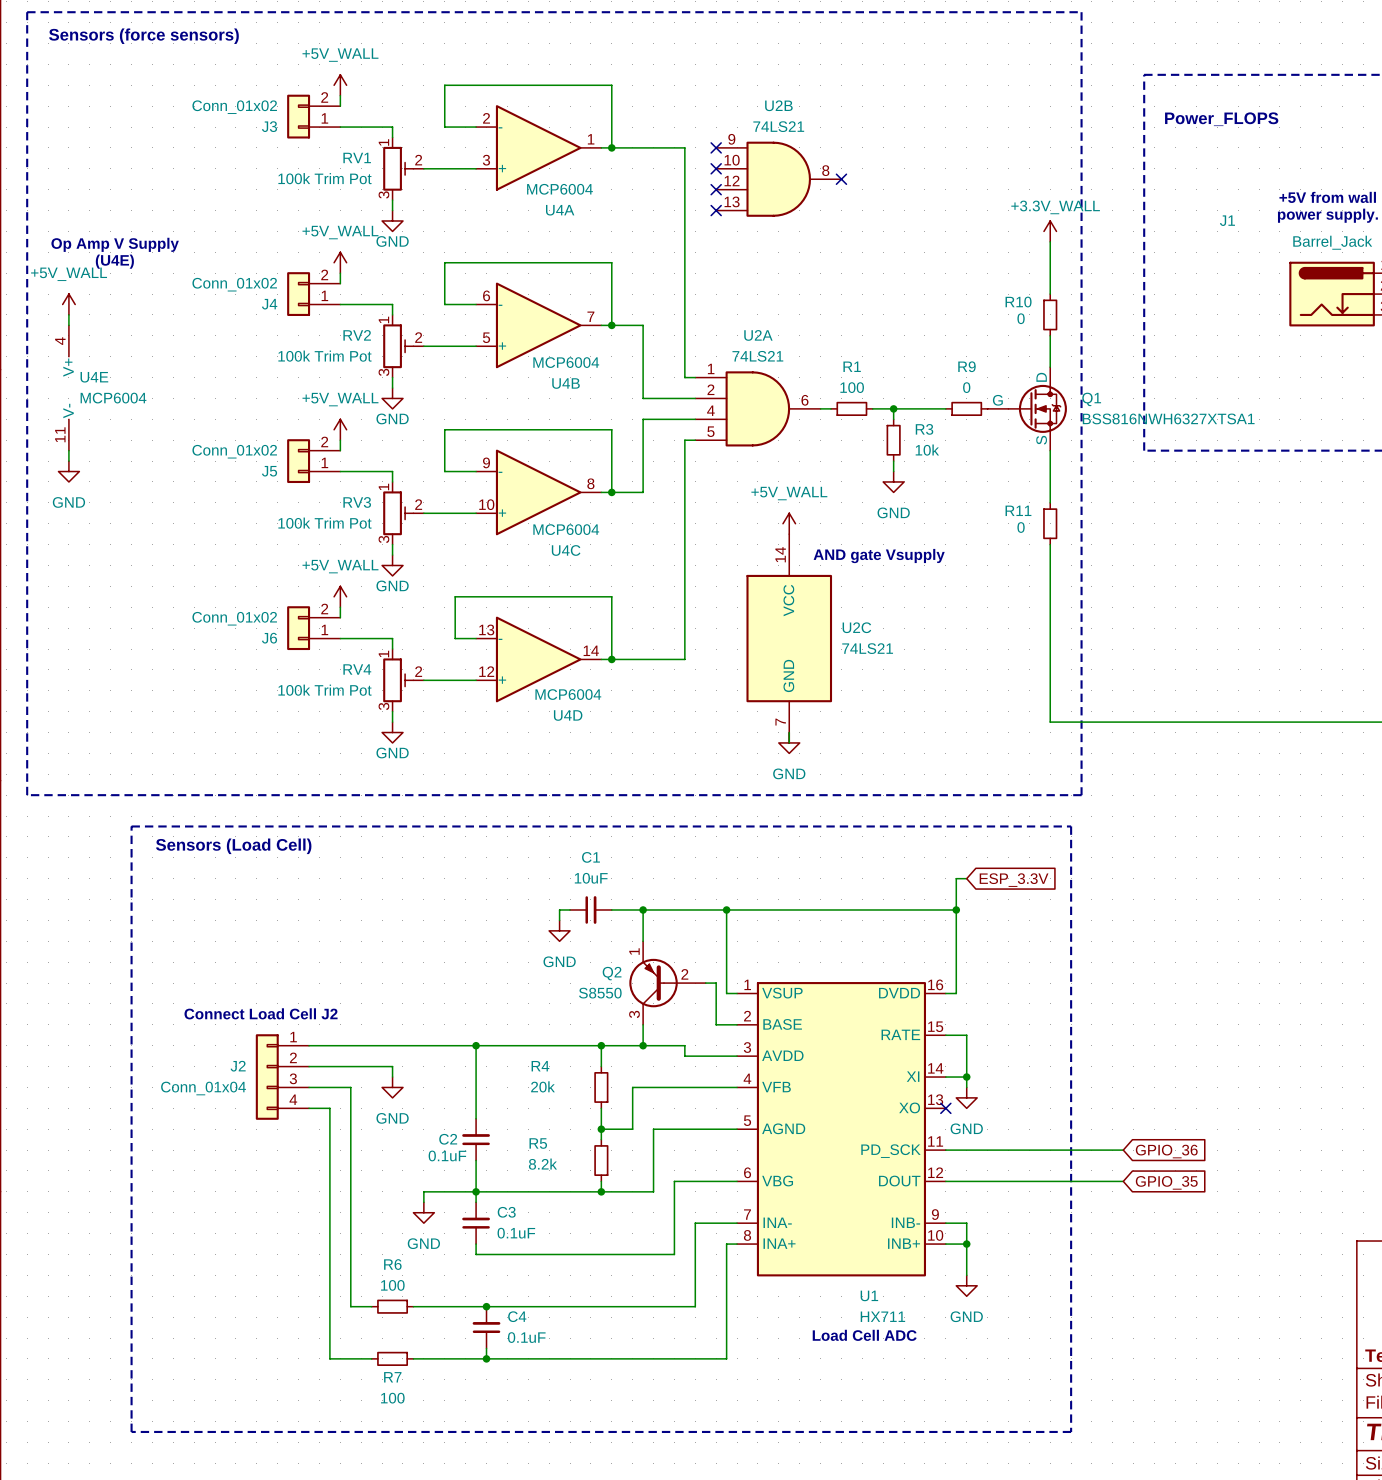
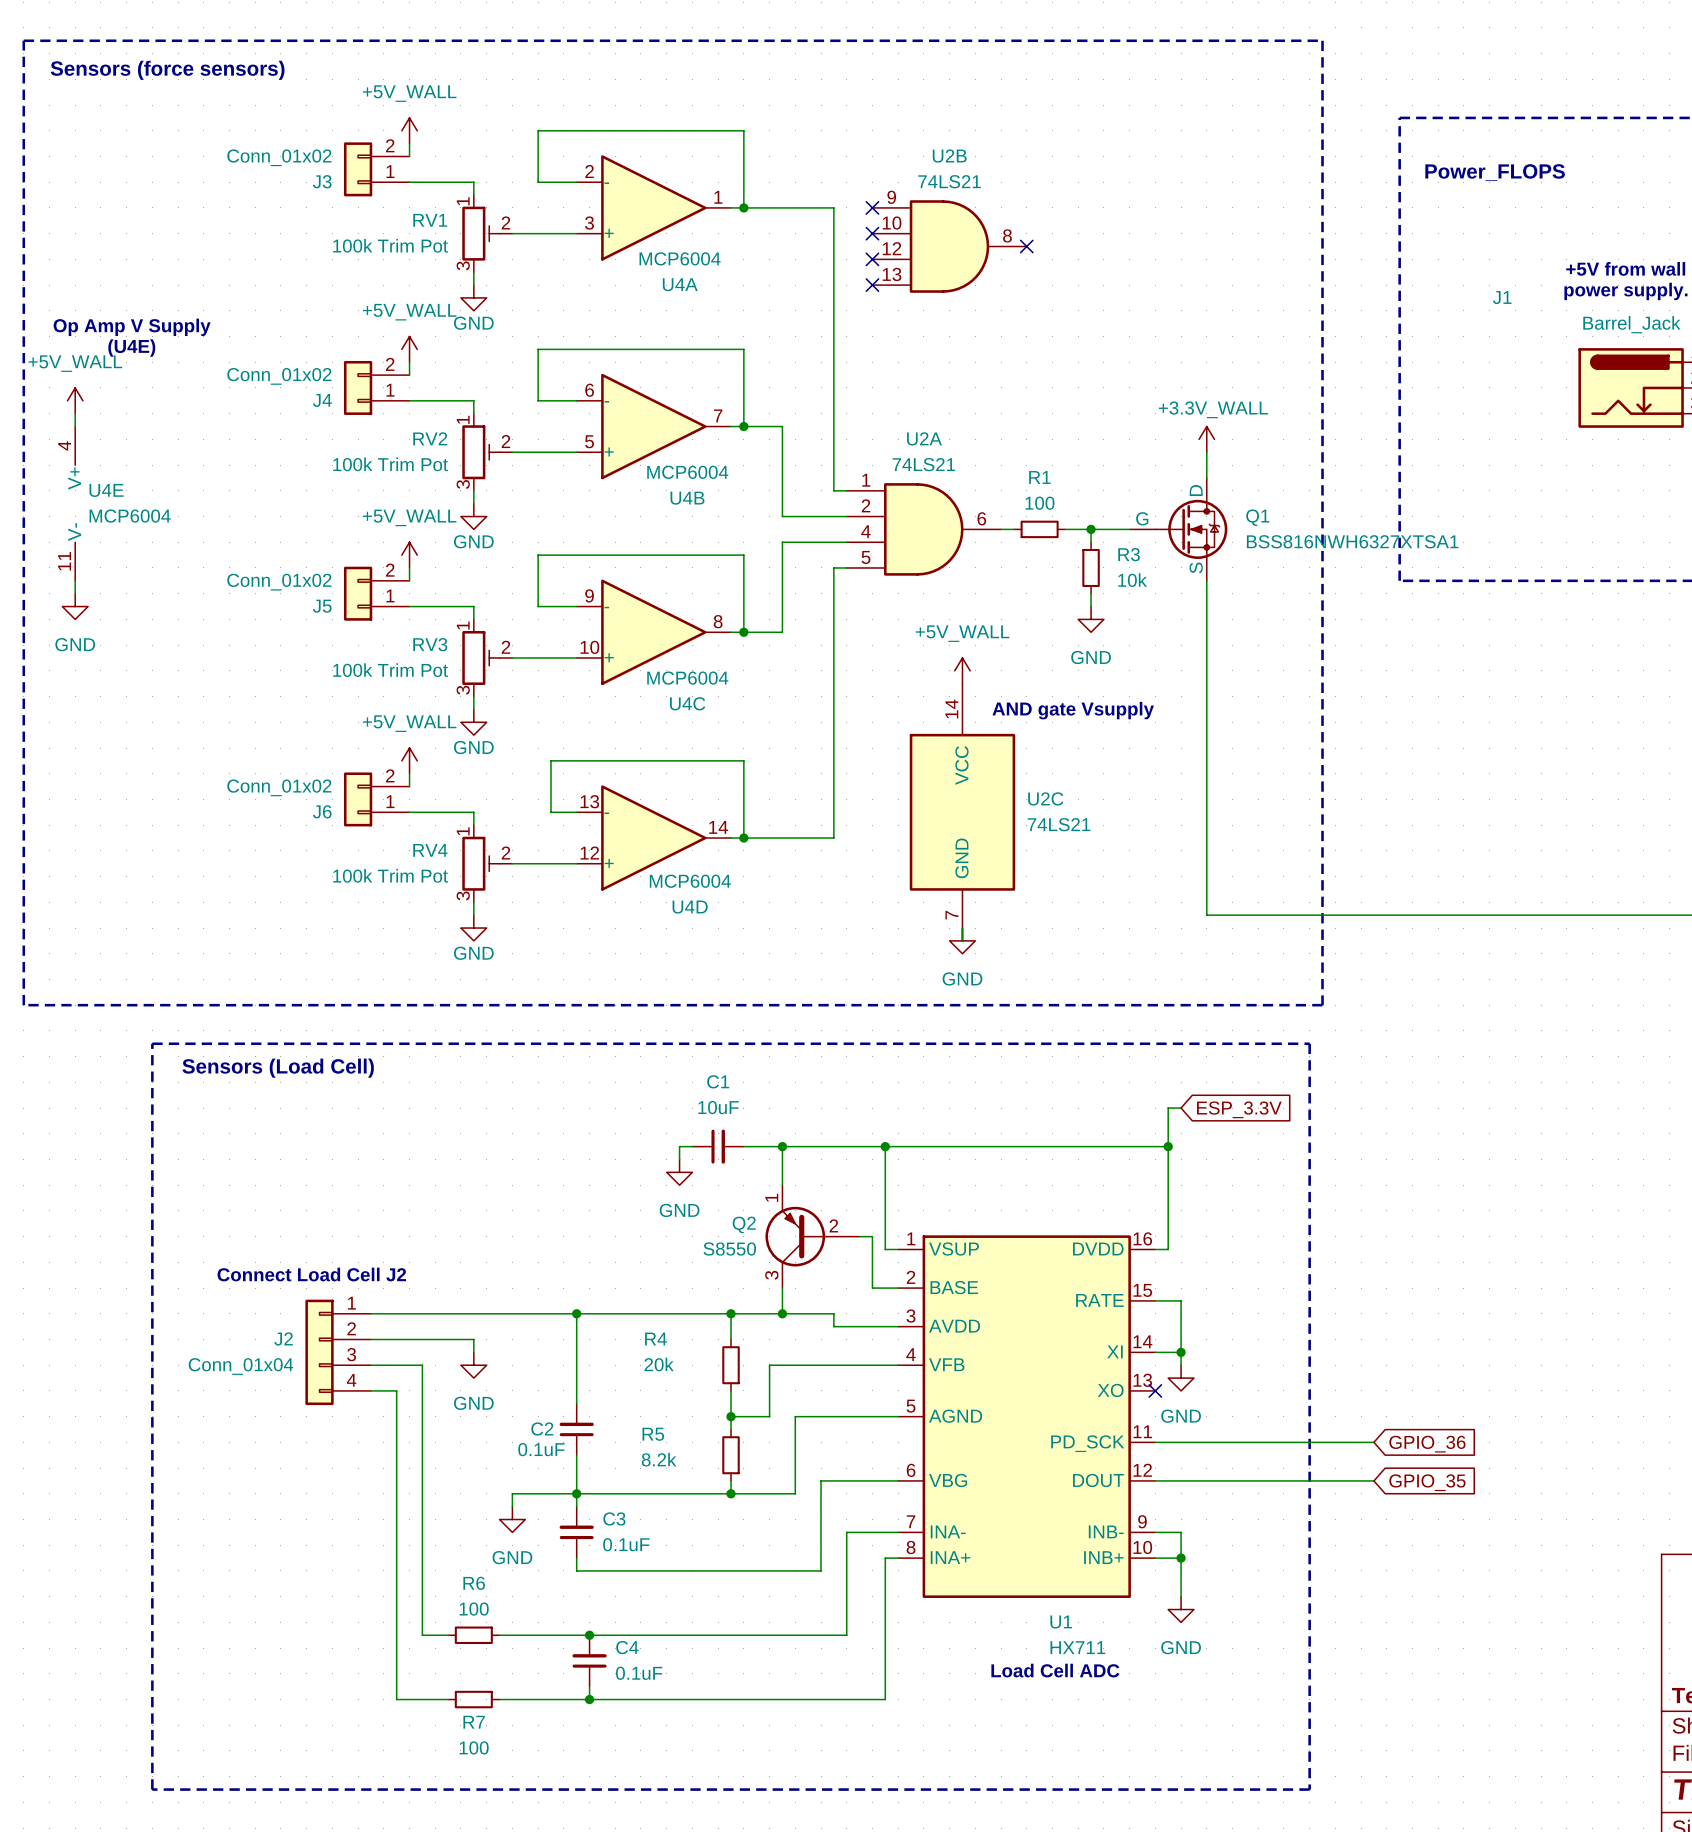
power symbol position: +3.3V_WALL (1050, 231) -> +3.3V_WALL (1206, 439)
wire: (1050, 241) (1050, 294) -> none
R10: 0 (1050, 314) -> none
wire: (1050, 335) (1050, 367) -> none
wire: none -> (1206, 452) (1206, 477)
R9: 0 (966, 408) -> none
Q1 position: (1027, 408) -> (1178, 529)
wire: (1050, 450) (1050, 502) -> none
R11: 0 (1050, 523) -> none
wire: (1050, 544) (1050, 722) -> (1206, 580) (1206, 915) (1283, 915)

